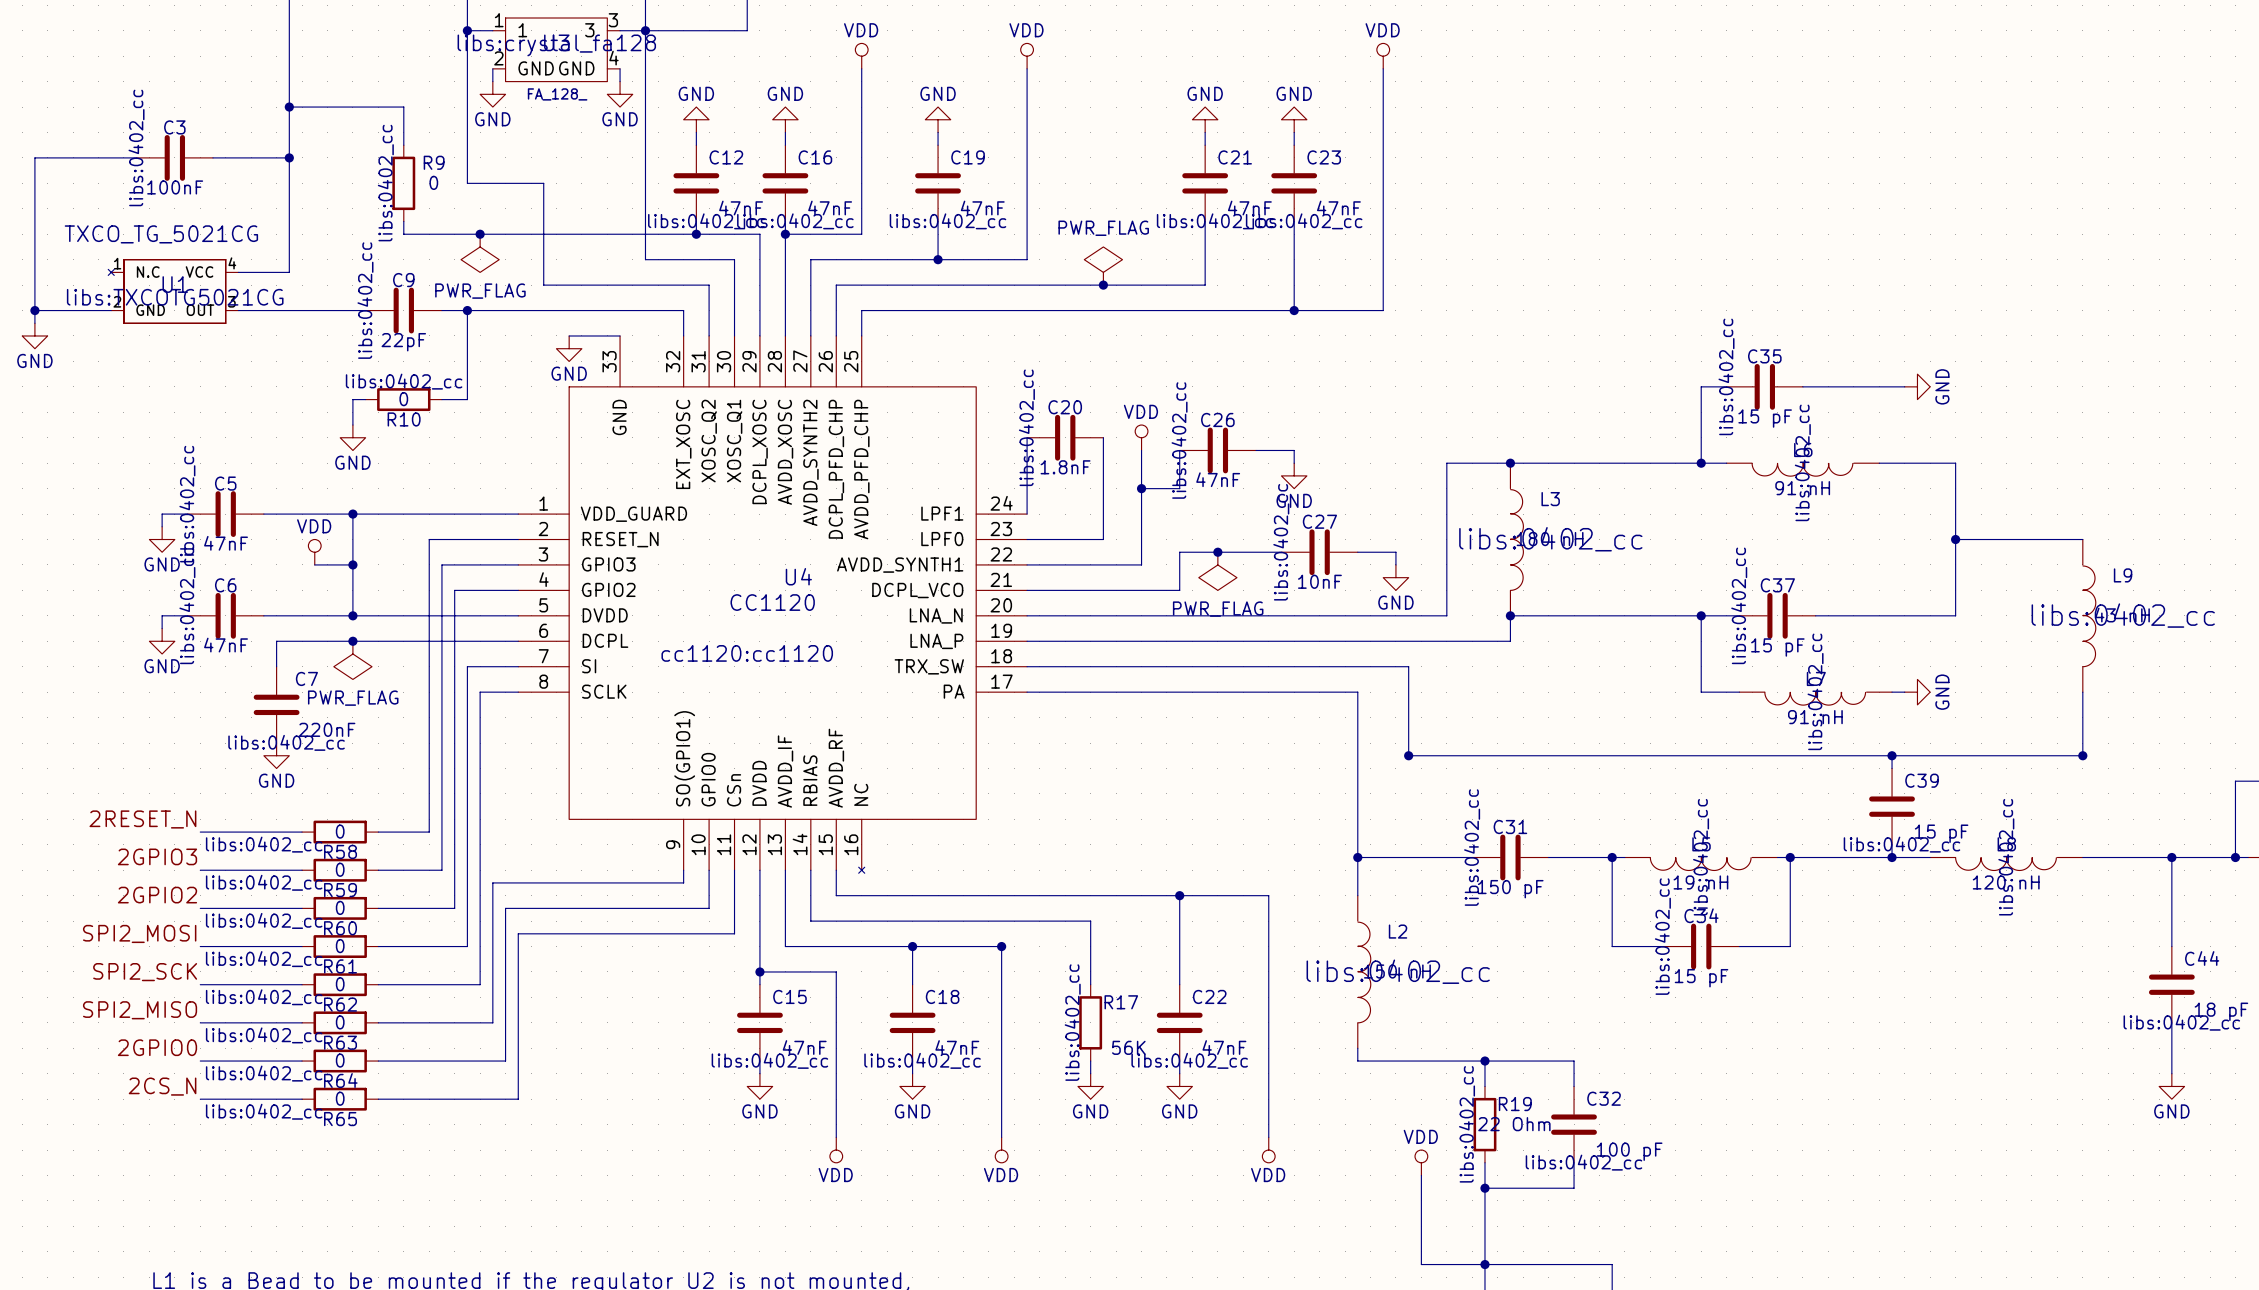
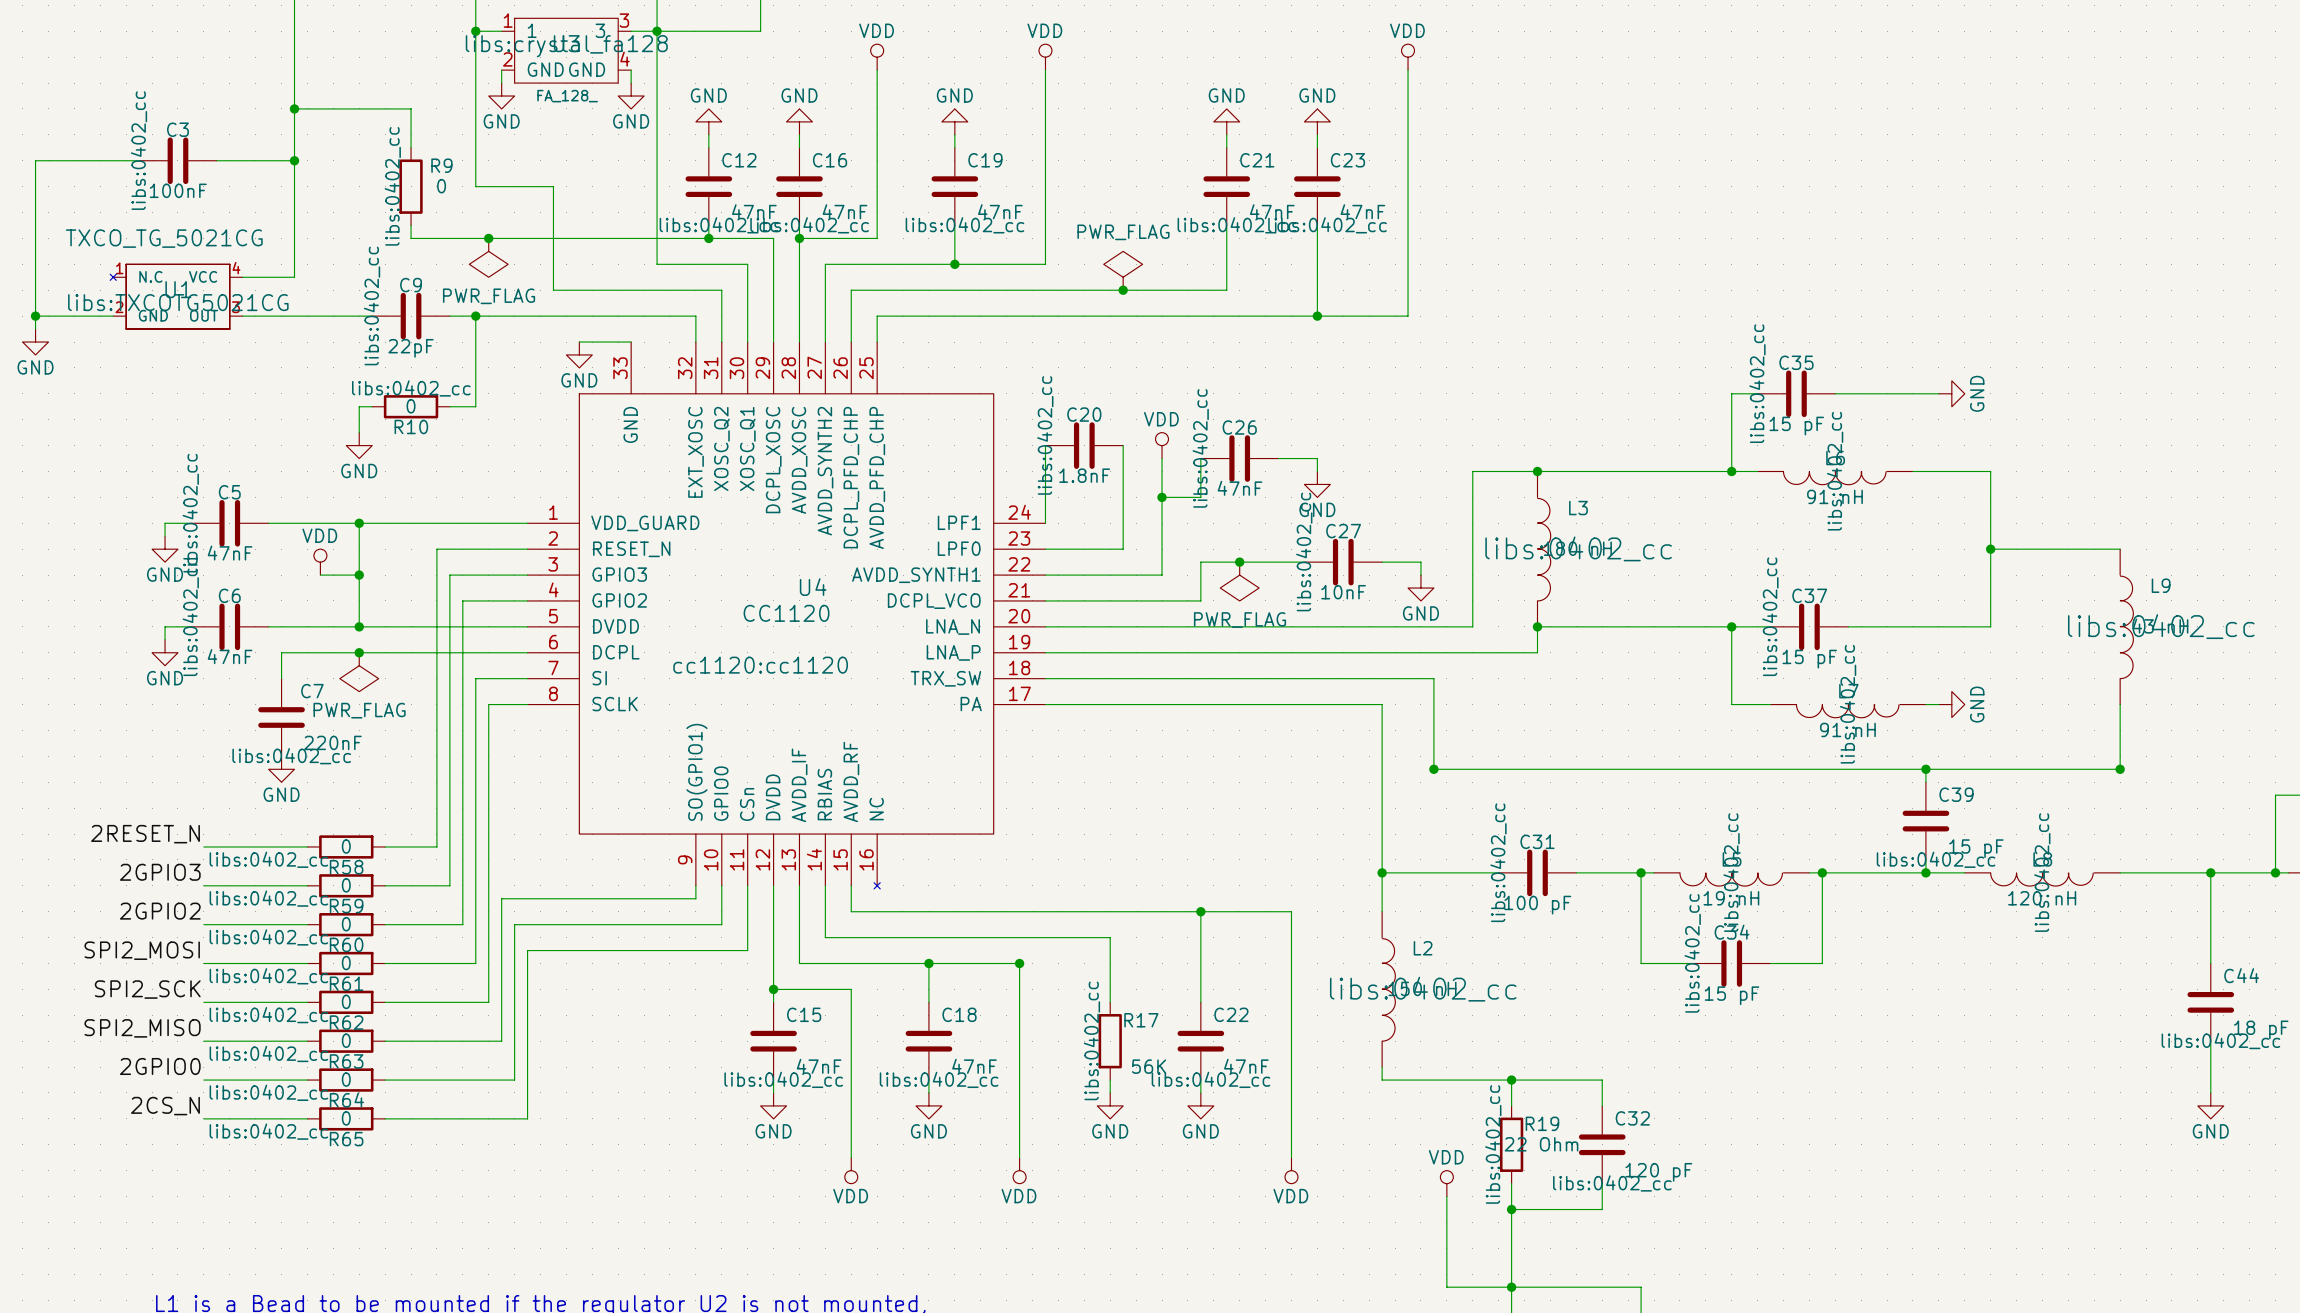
C31 value: 150 pF (1510, 889) -> 100 pF (1537, 905)
C32 value: 100 pF (1629, 1151) -> 120 pF (1658, 1172)

